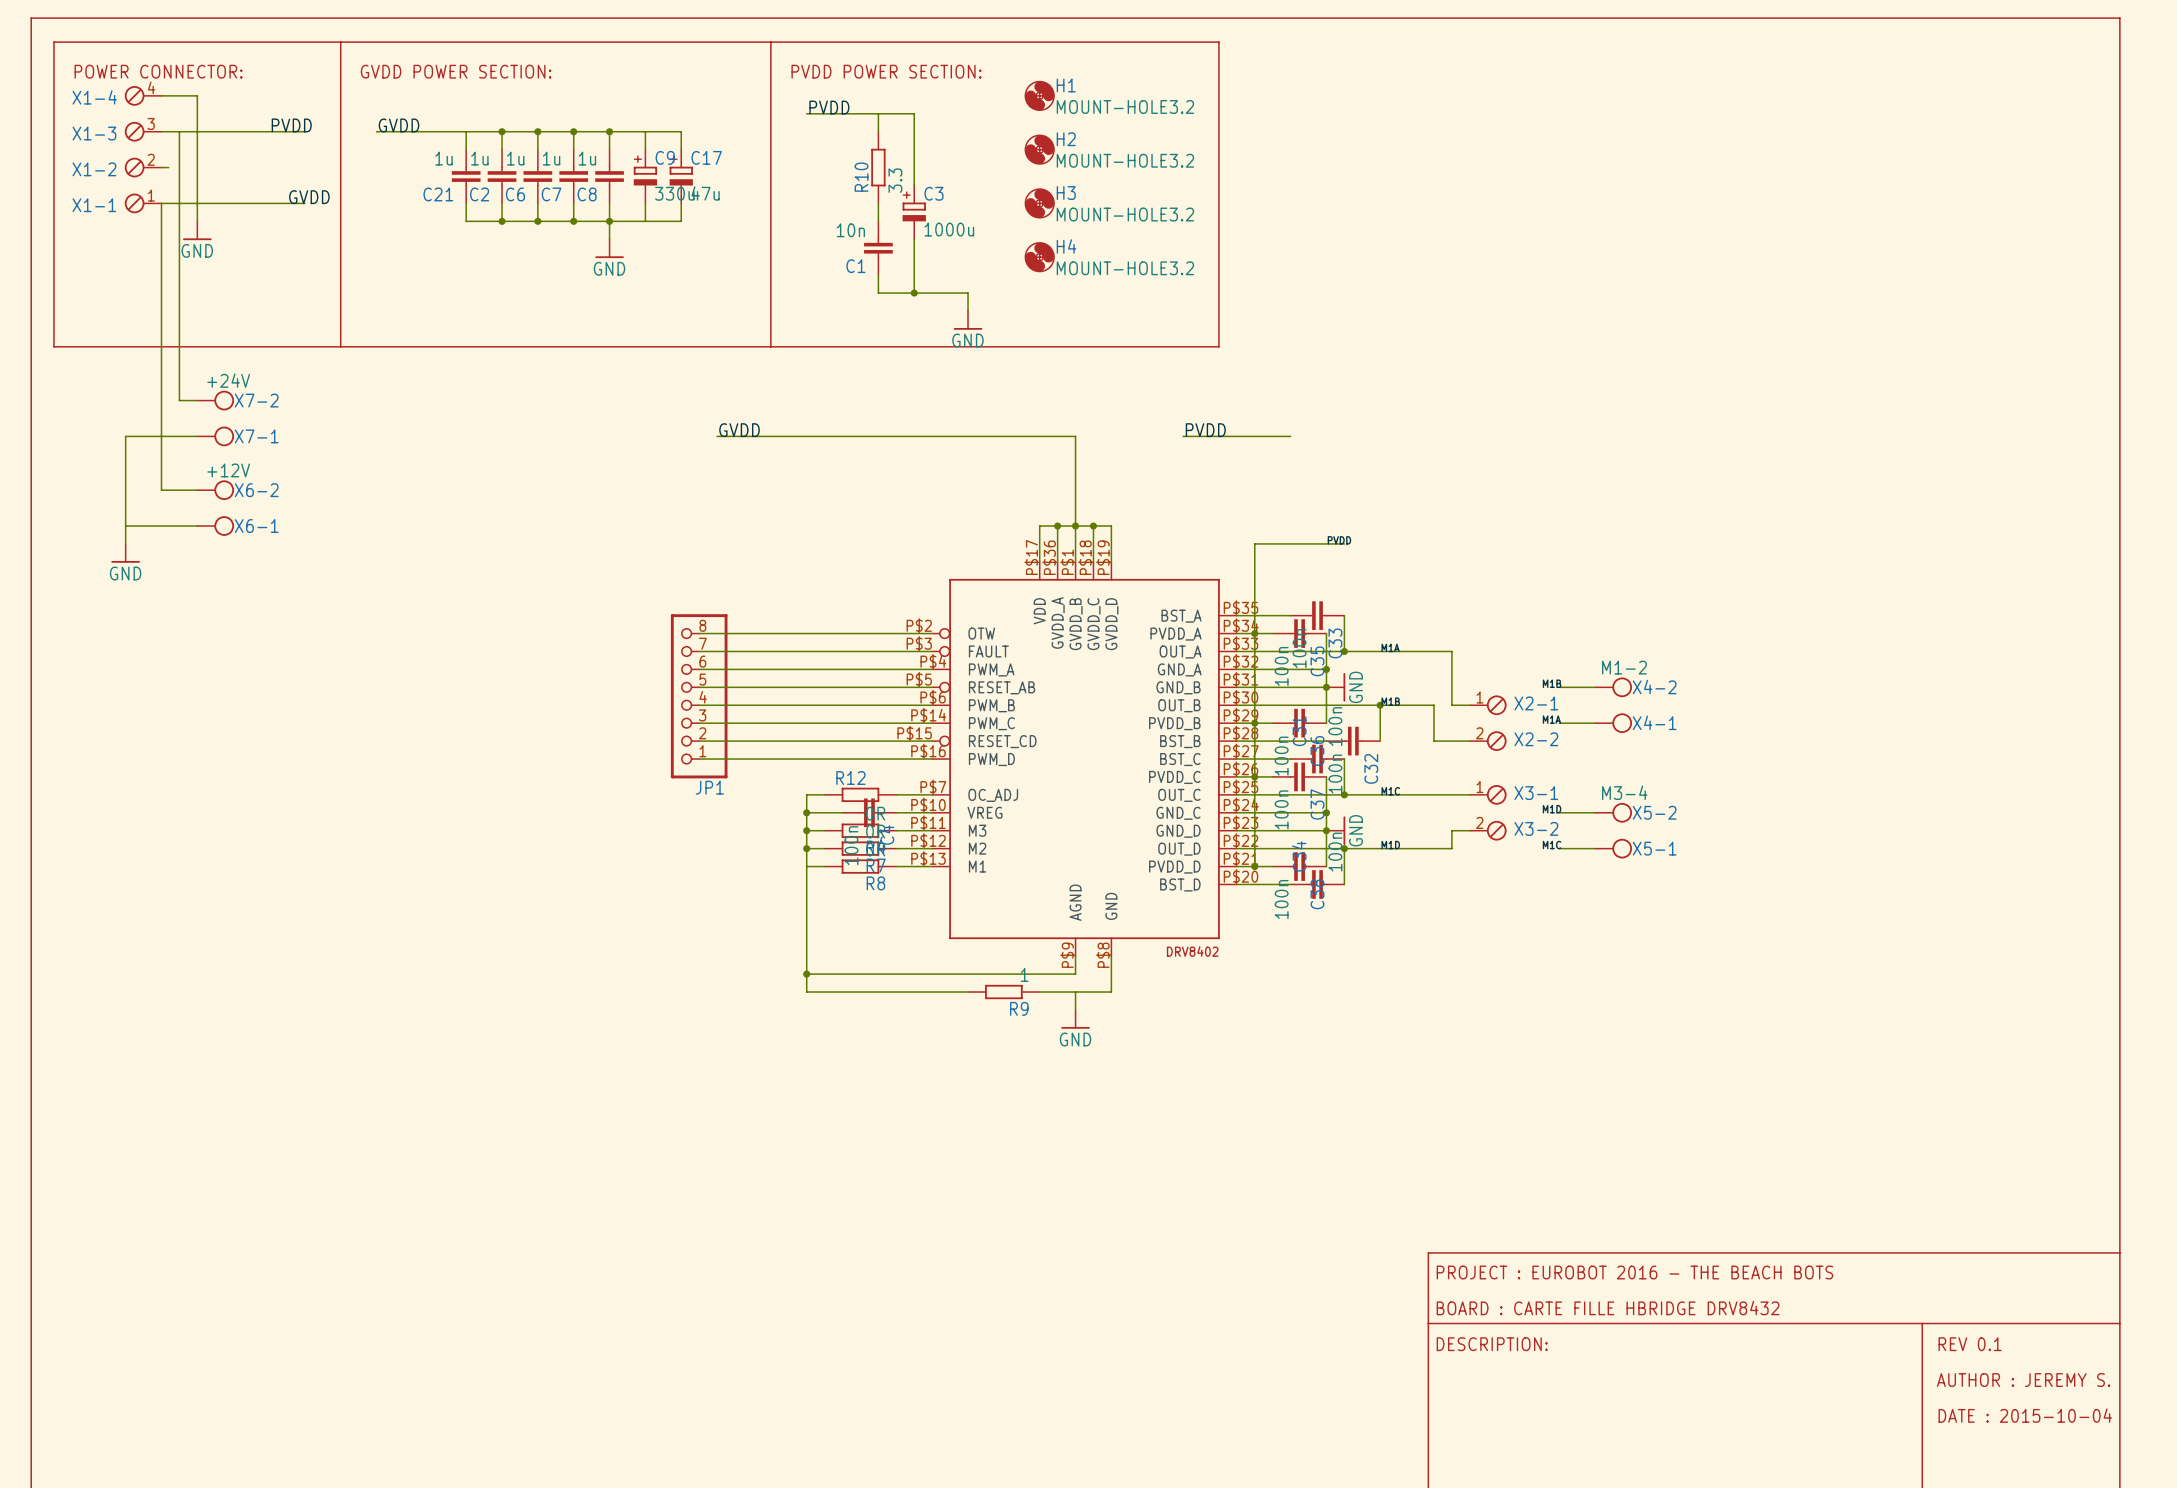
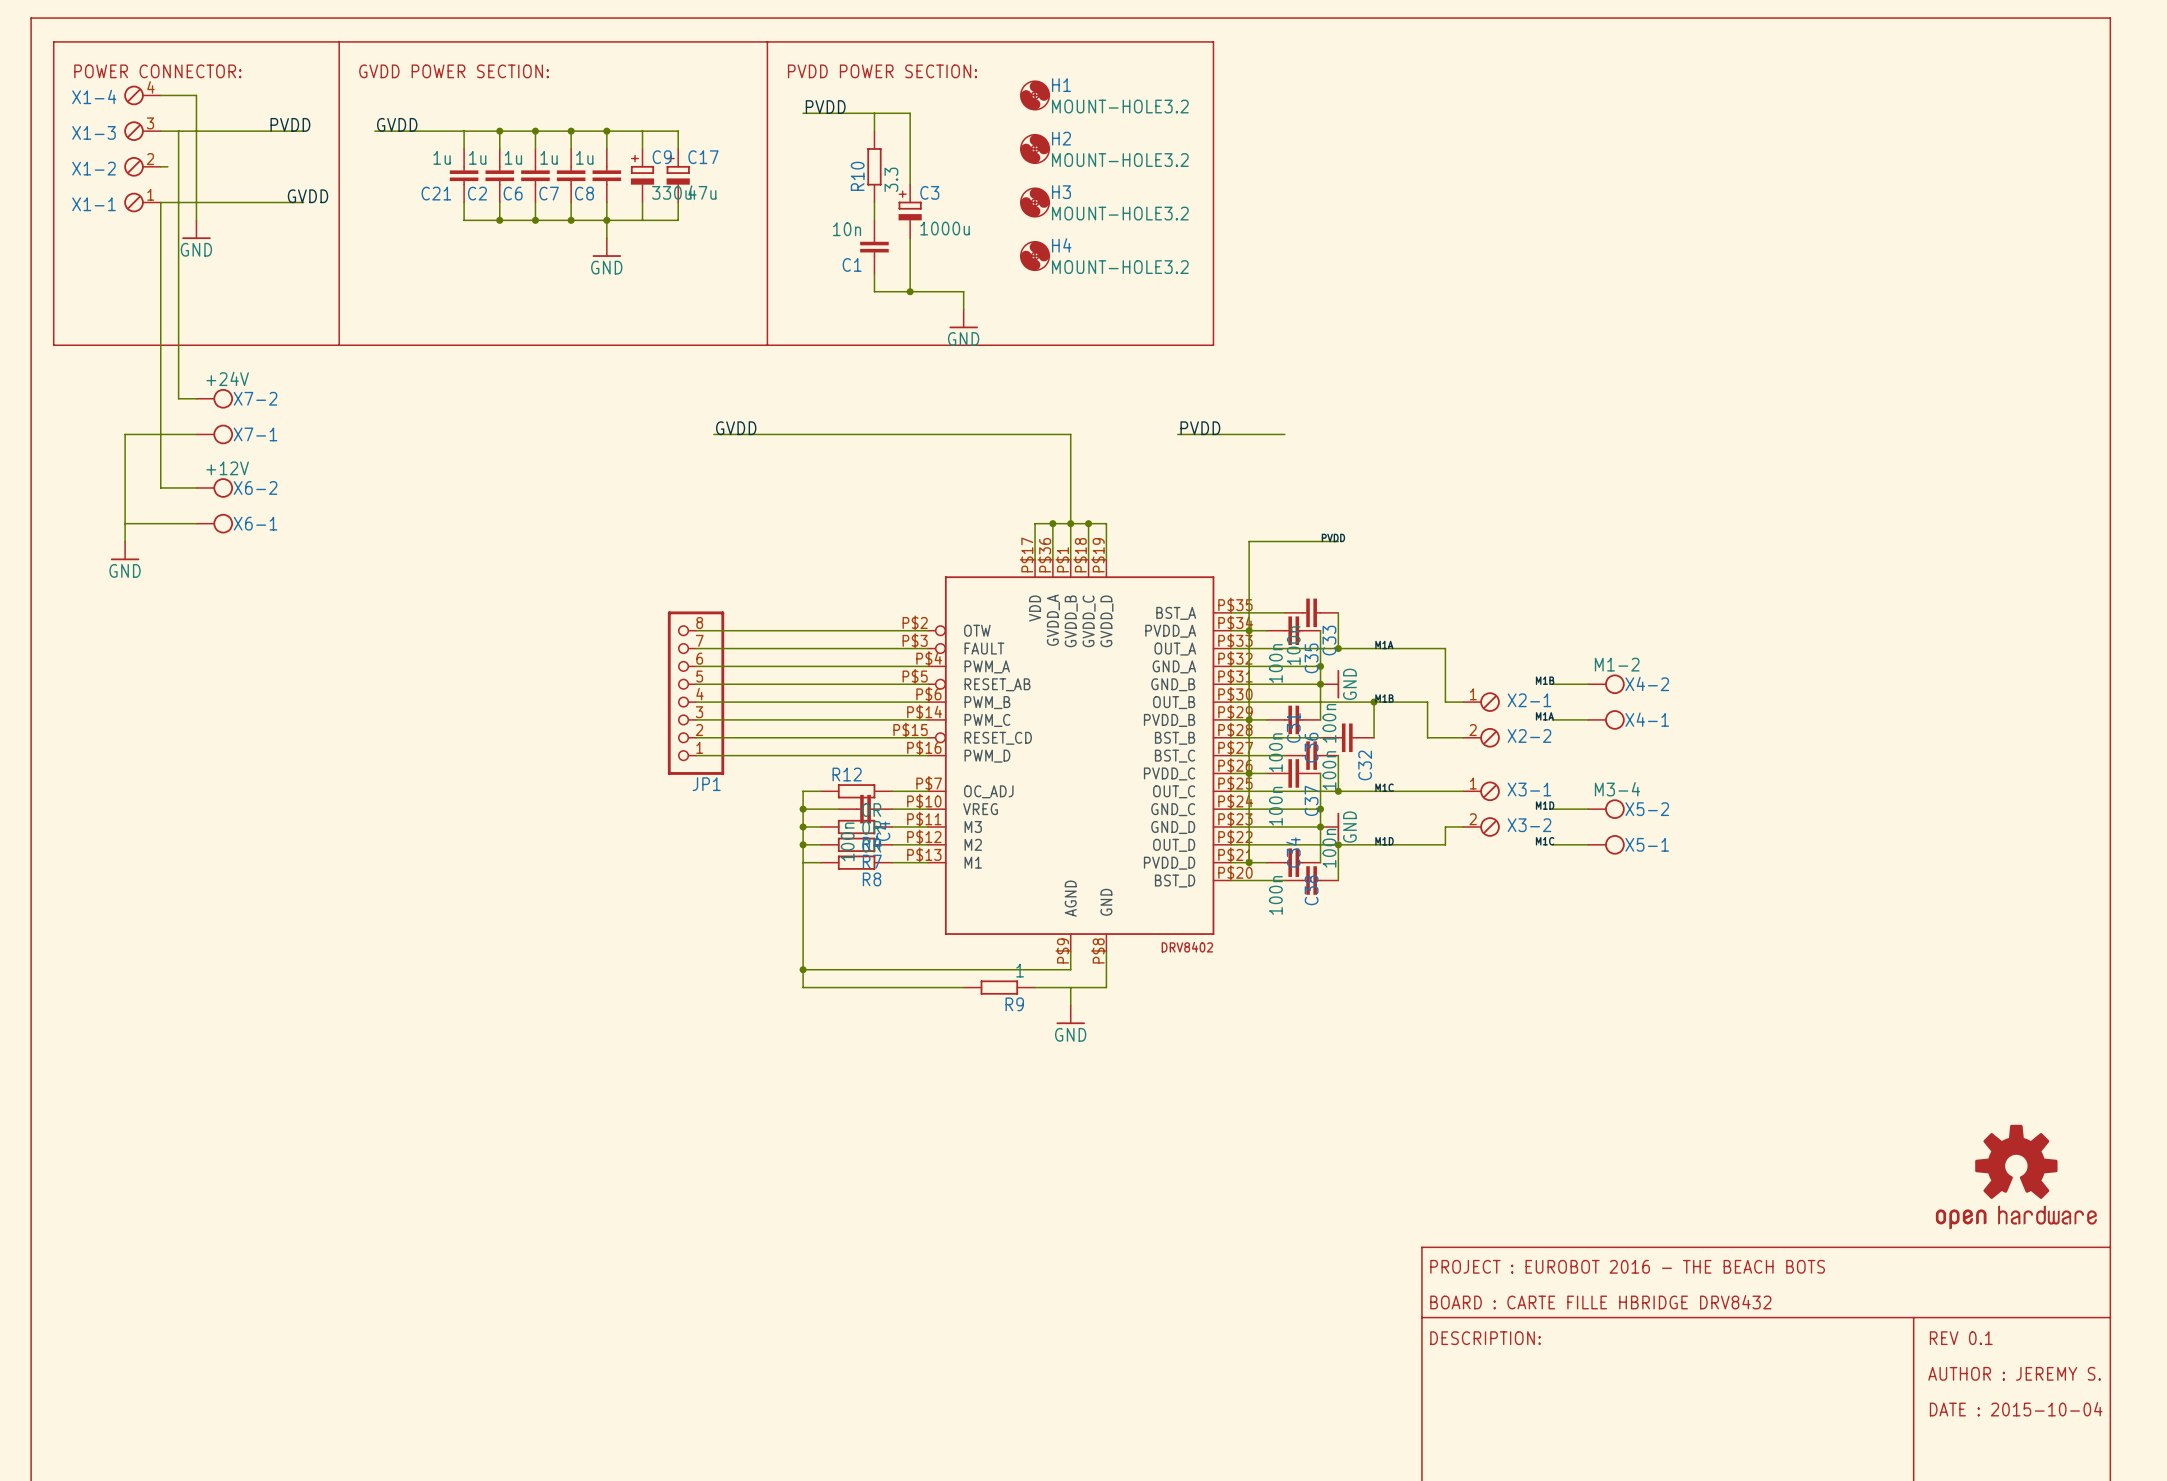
part: none -> (2016, 1177)

